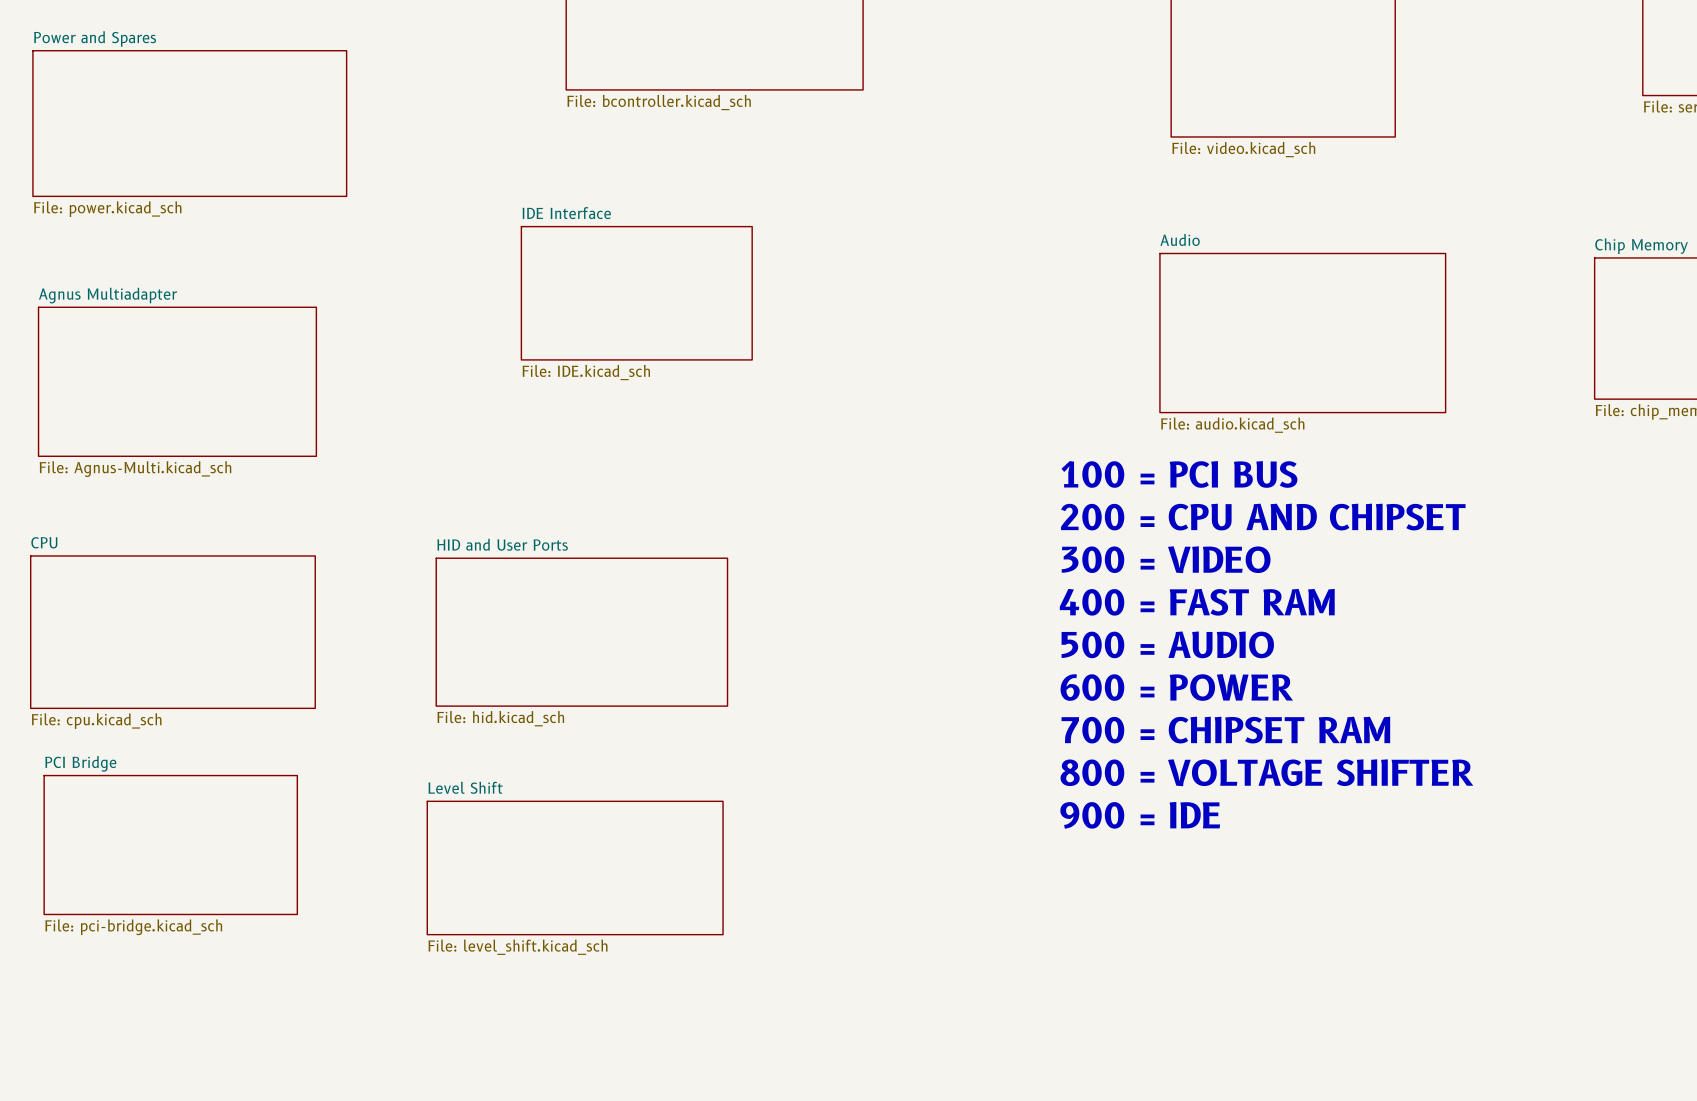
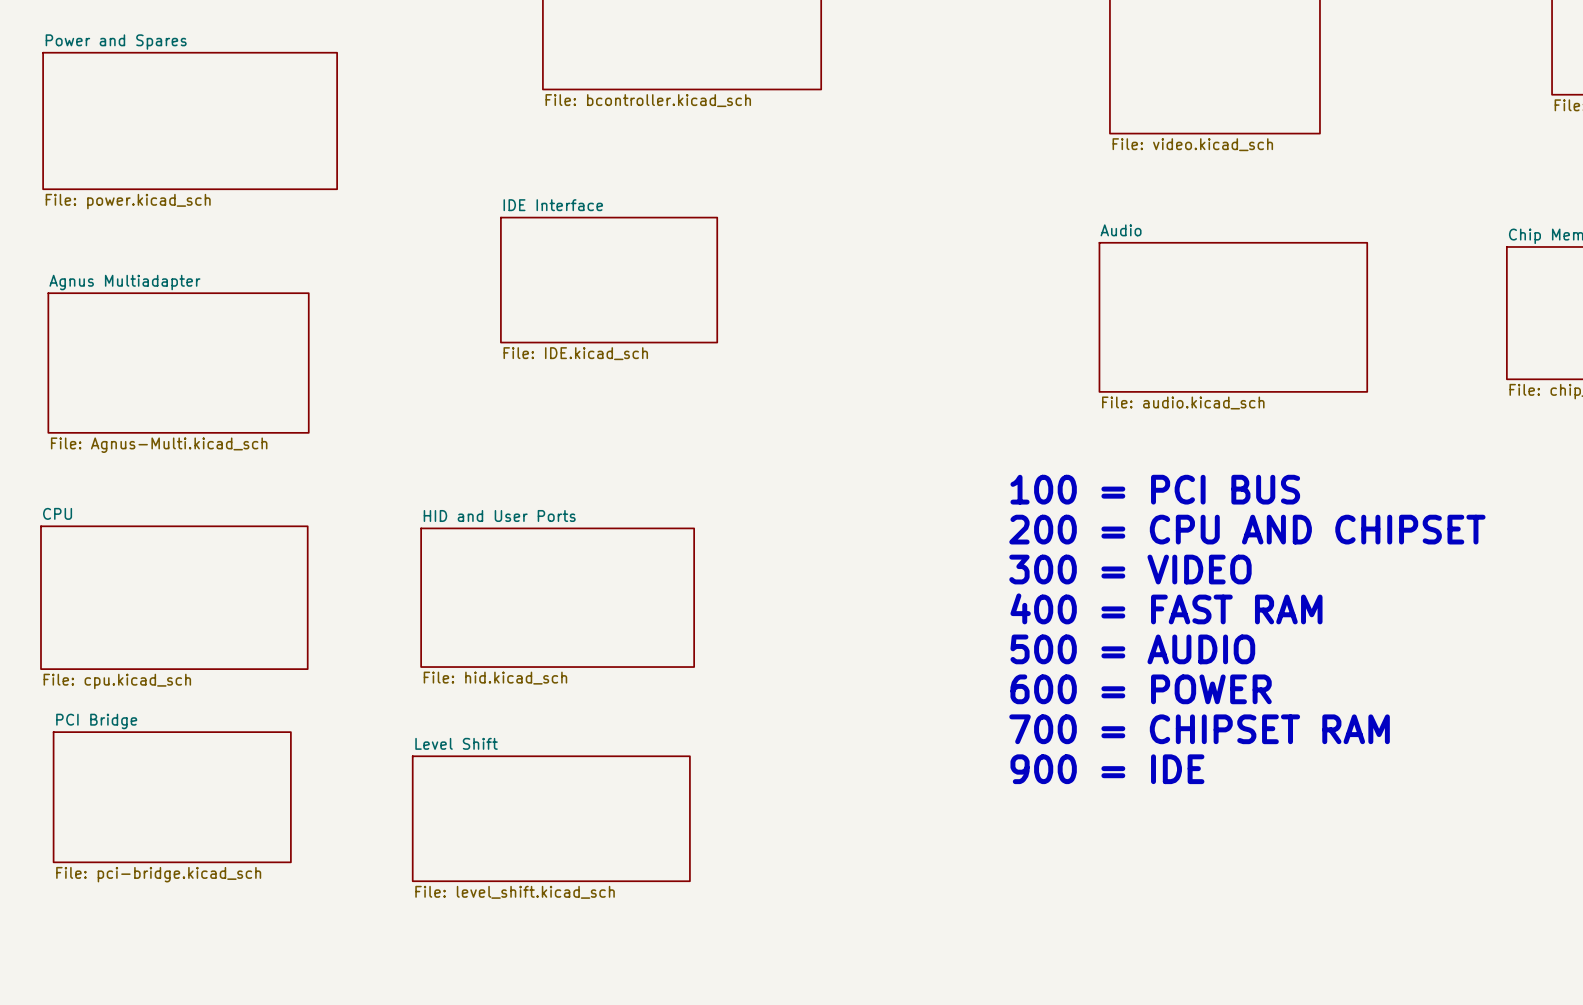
text: 100 = PCI BUS (1179, 474) -> none
text: 200 = CPU AND CHIPSET (1263, 517) -> 100 = PCI BUS (1155, 489)
text: 300 = VIDEO (1166, 559) -> 200 = CPU AND CHIPSET (1247, 529)
text: 400 = FAST RAM (1197, 602) -> 300 = VIDEO (1130, 569)
text: 500 = AUDIO (1167, 644) -> 400 = FAST RAM (1166, 608)
text: 600 = POWER (1176, 687) -> 500 = AUDIO (1132, 649)
text: 700 = CHIPSET RAM (1225, 730) -> 600 = POWER (1141, 689)
text: 800 = VOLTAGE SHIFTER (1266, 772) -> 700 = CHIPSET RAM (1199, 729)

